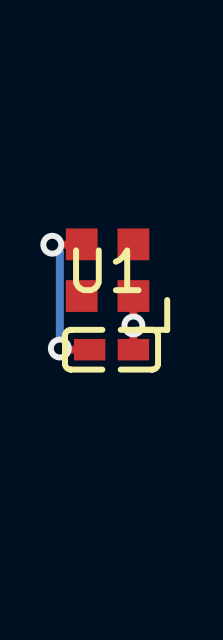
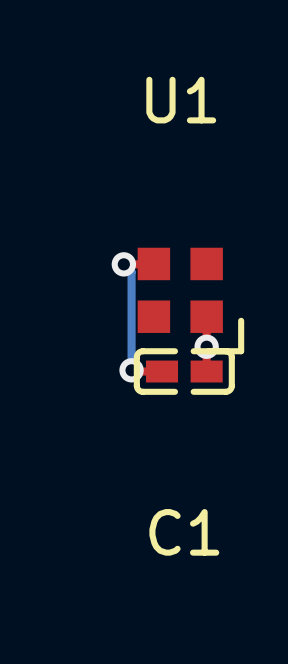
U1 name position: U1 (107, 270) -> U1 (181, 100)
C1 name: none -> C1 (184, 532)

